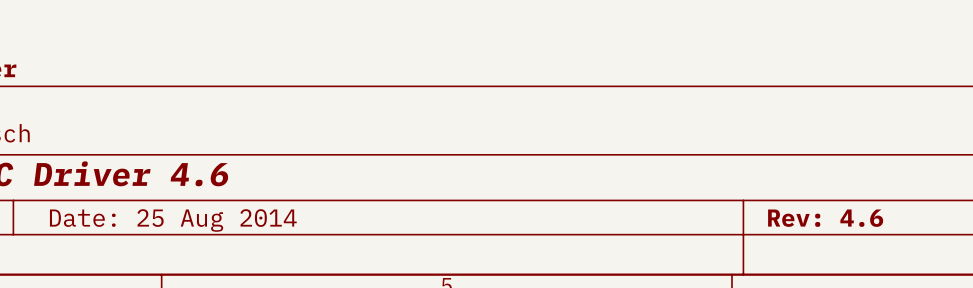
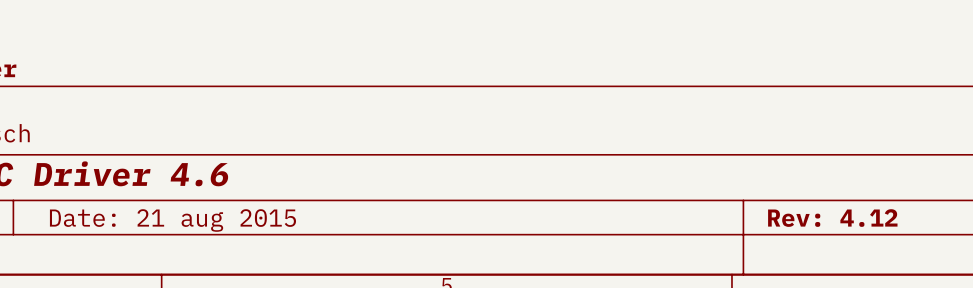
title block: Rev: 4.6 (825, 218) -> Rev: 4.12 (832, 218)
title block: Date: 25 Aug 2014 (173, 220) -> Date: 21 aug 2015 (172, 220)

